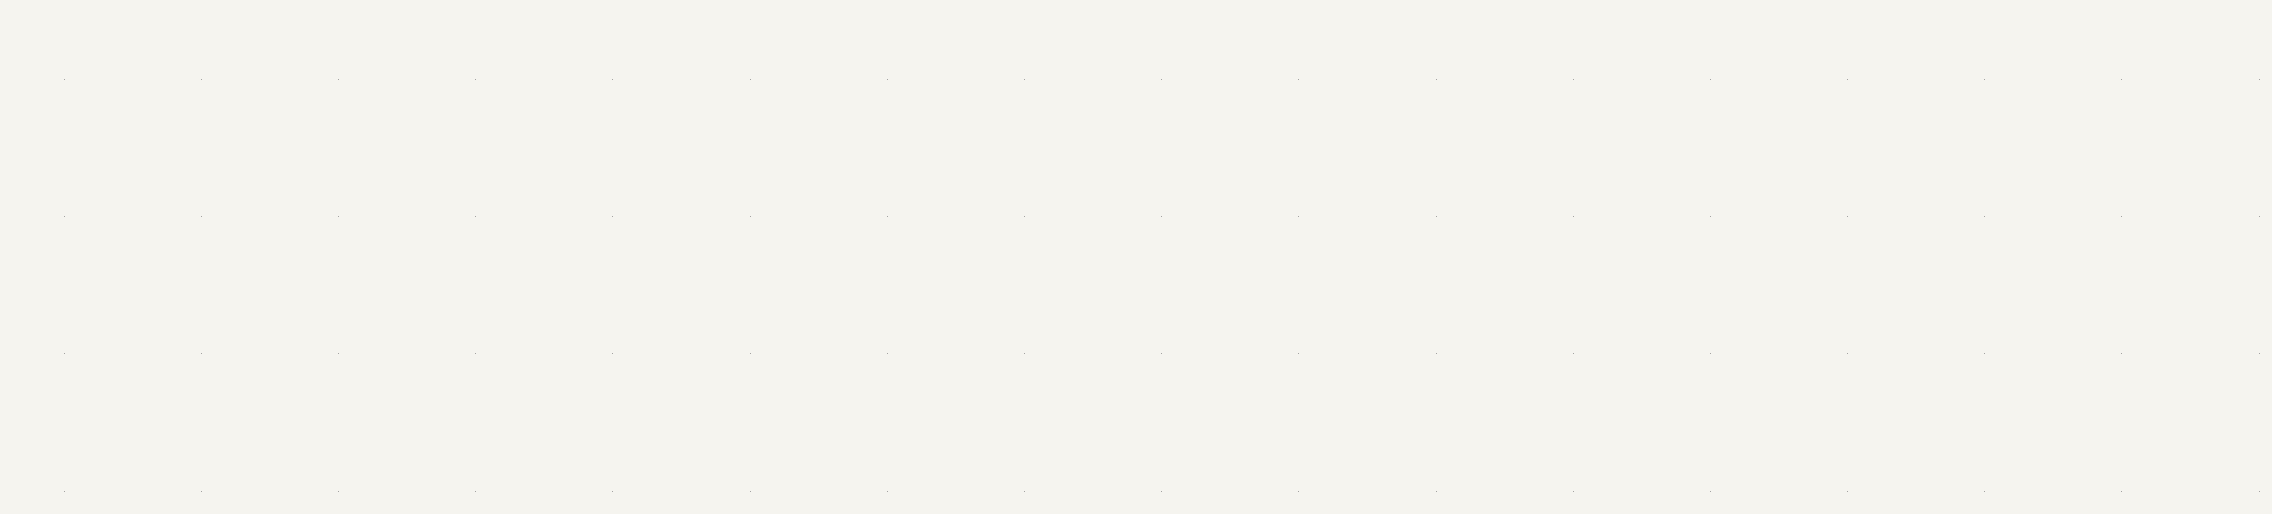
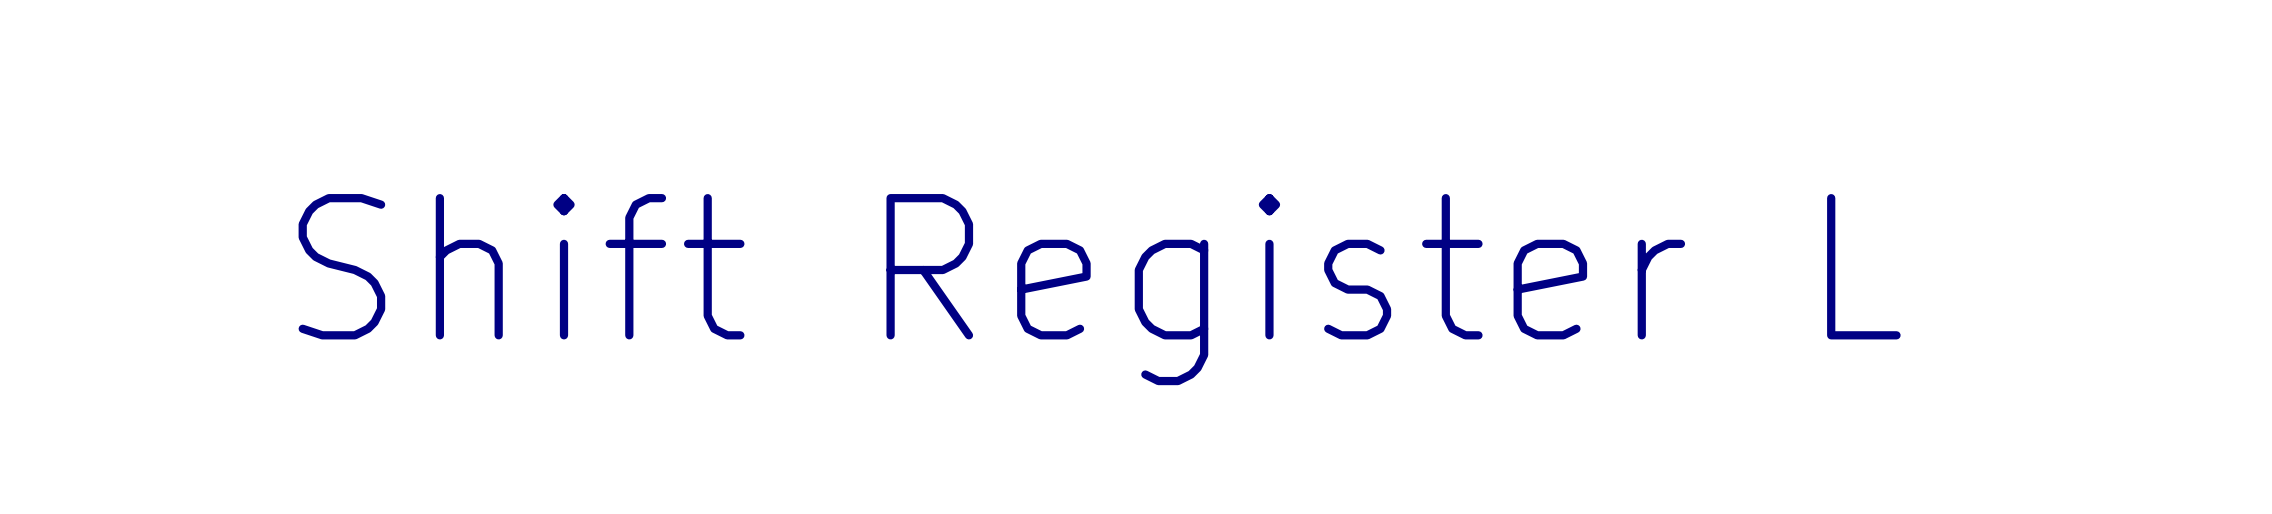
text: none -> Shift Register L (1099, 289)

